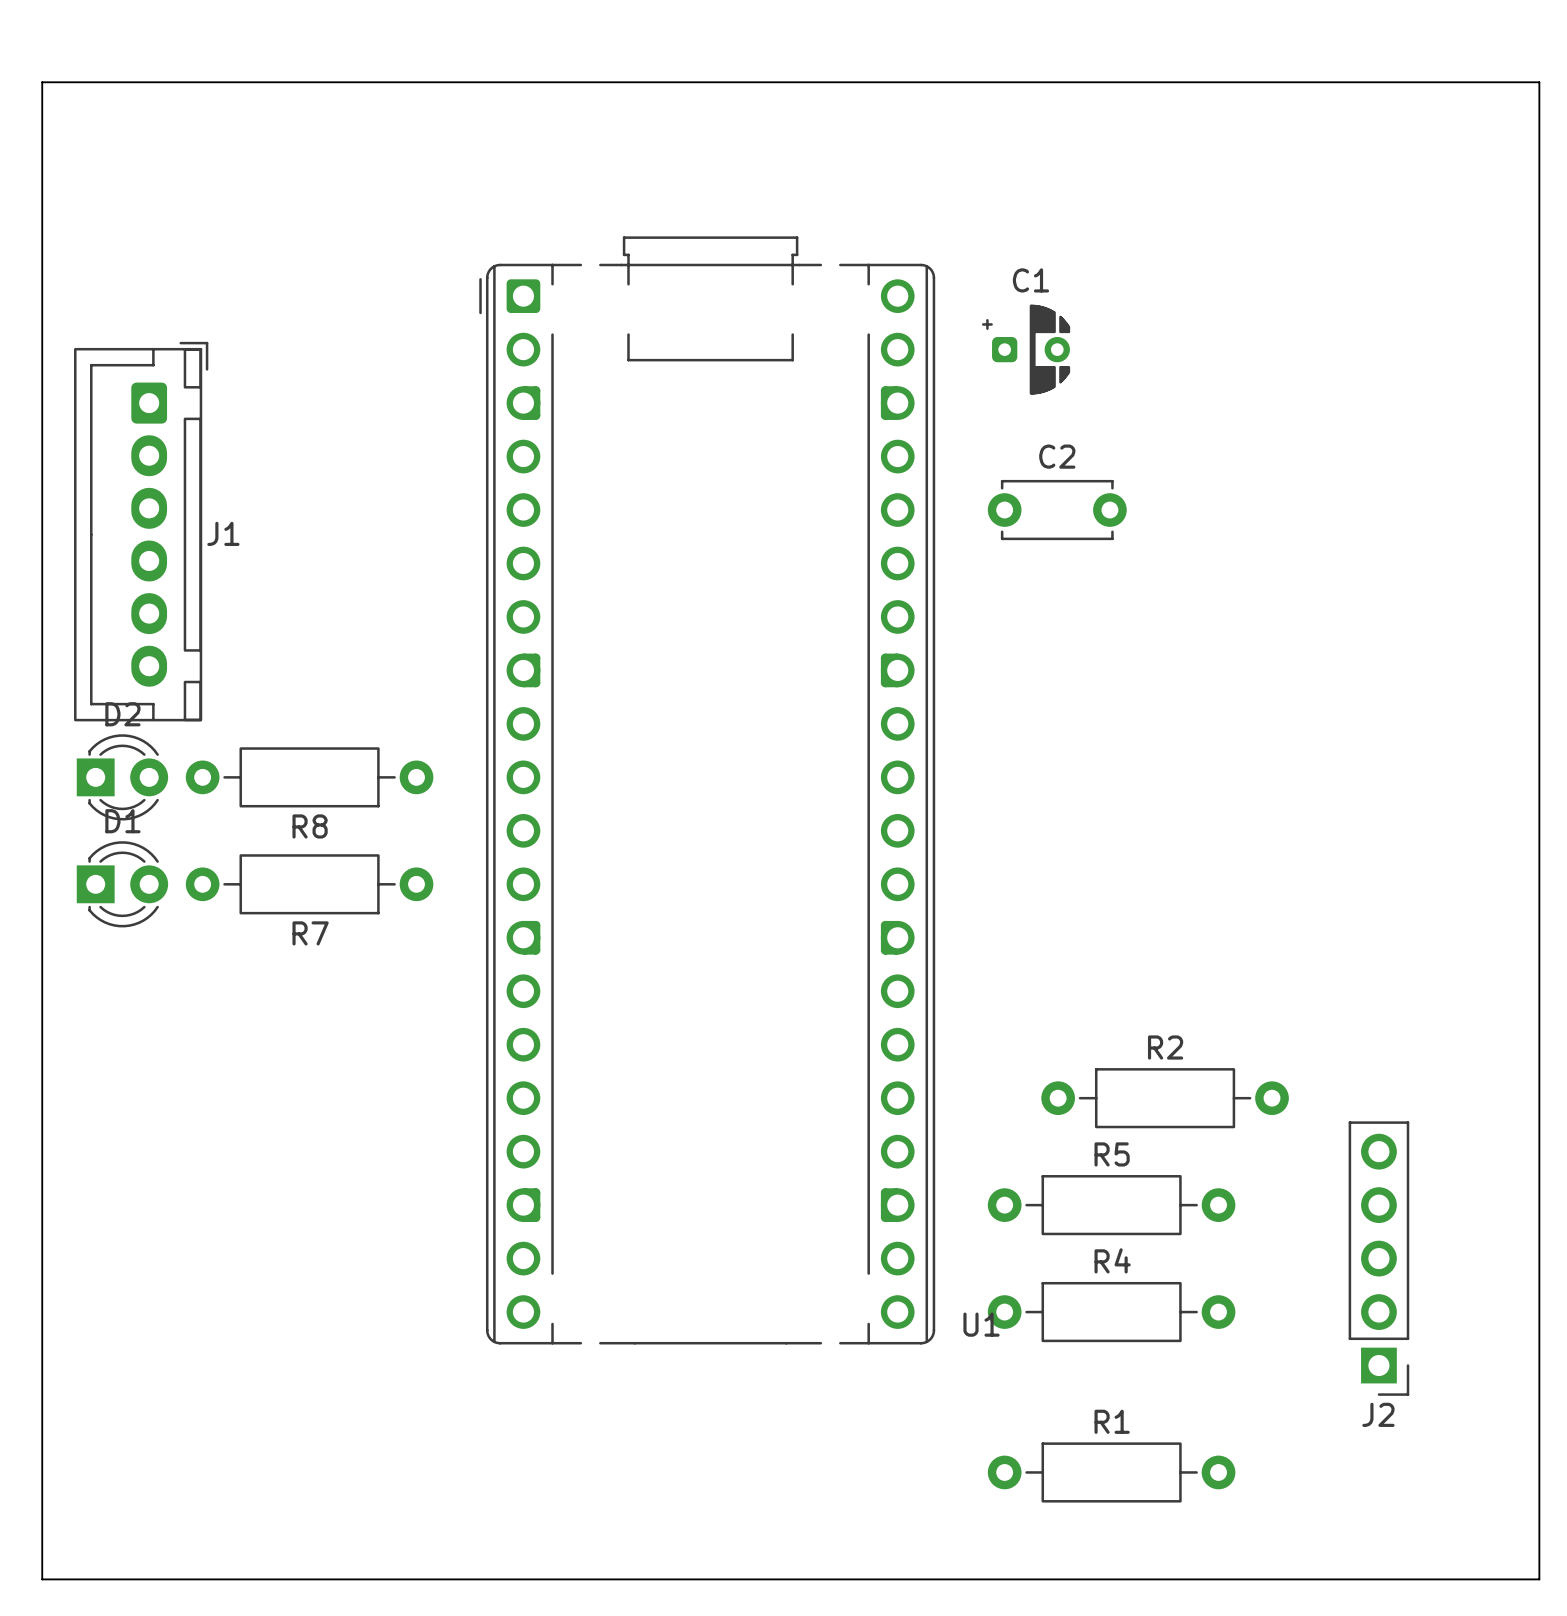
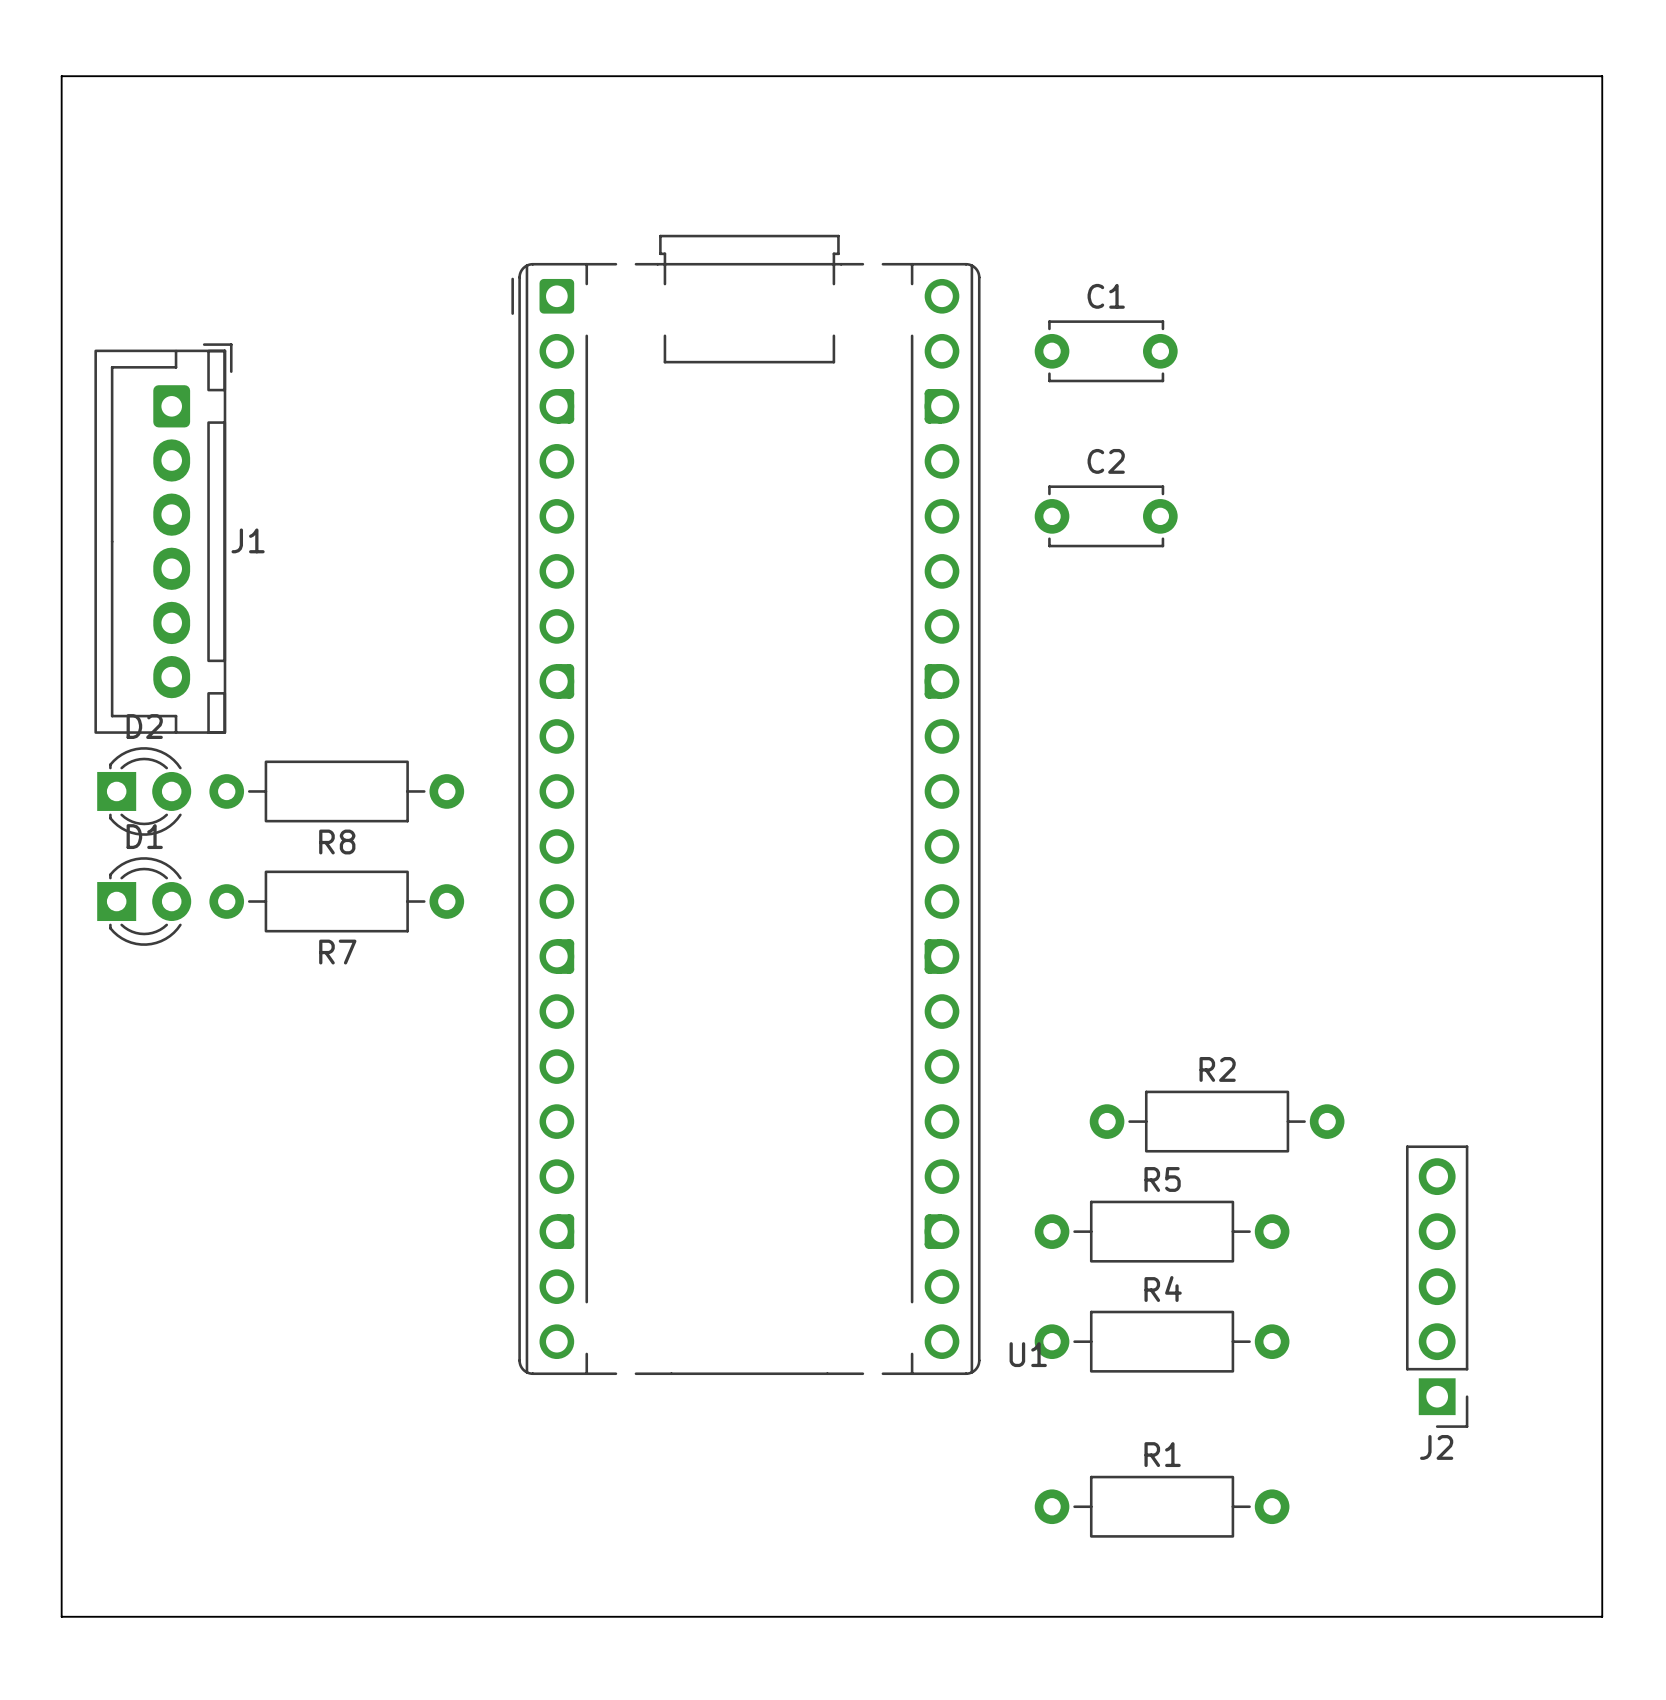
C1 footprint: [981, 304, 1071, 395] -> [1034, 320, 1178, 383]

